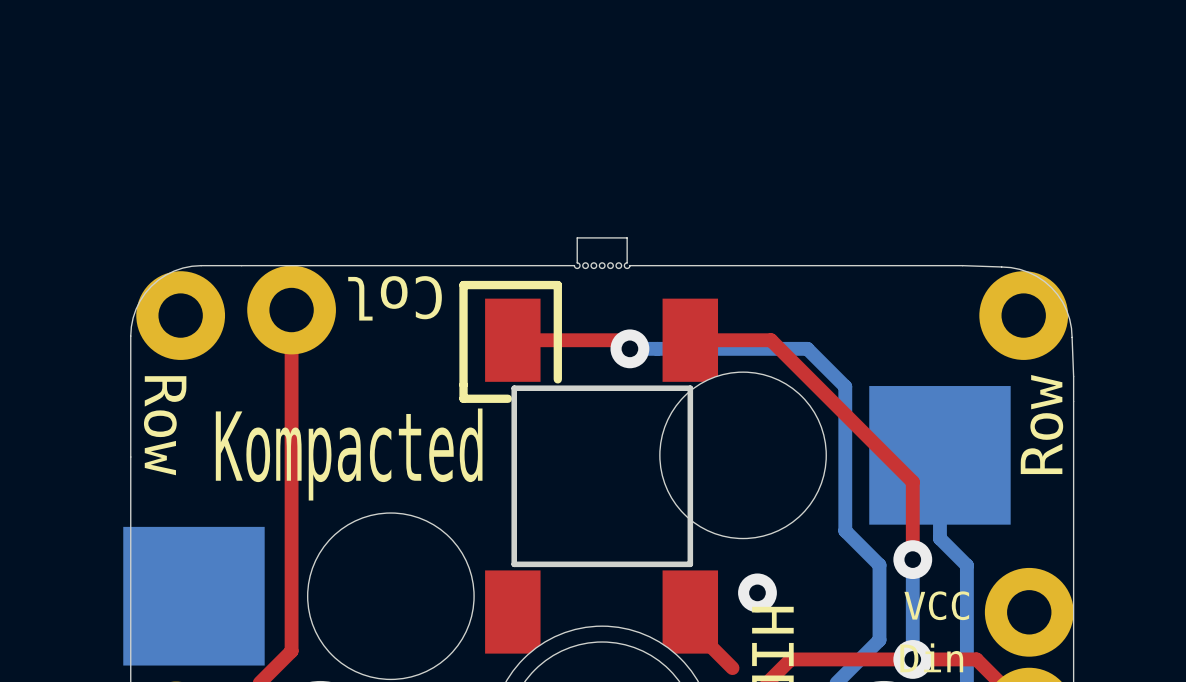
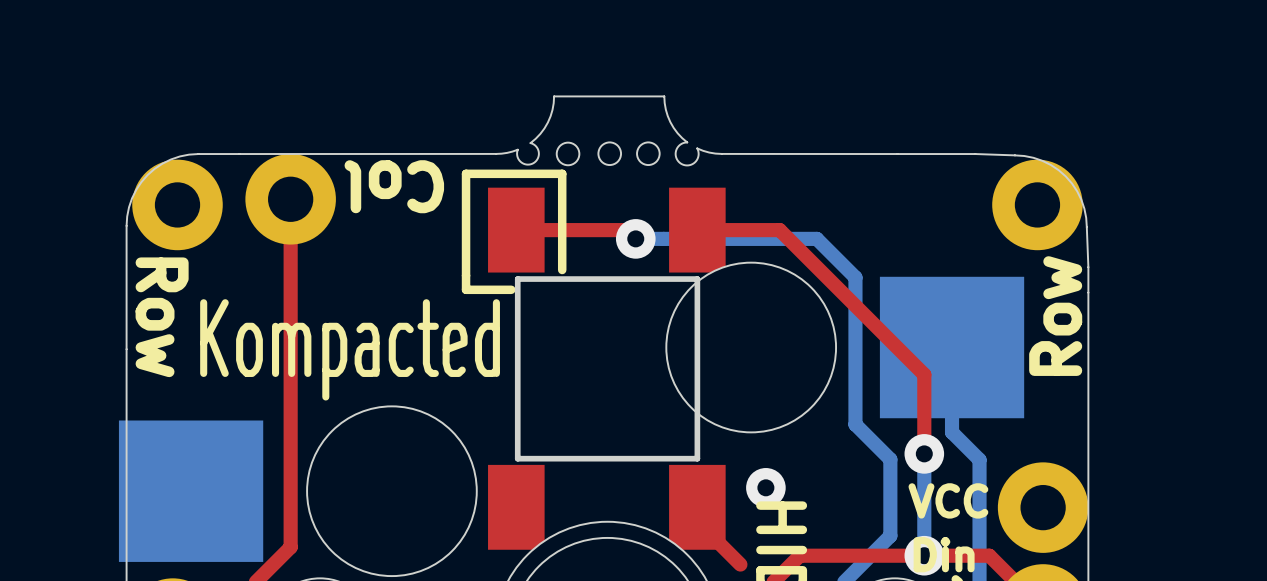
round board edge: none -> [636, 142, 660, 166]
round board edge: none -> [556, 142, 580, 166]
round board edge: [582, 262, 589, 269] -> none
round board edge: [590, 262, 597, 269] -> none
round board edge size: [599, 262, 606, 269] -> [598, 142, 622, 166]
round board edge: [607, 262, 614, 269] -> none
round board edge: [615, 262, 622, 269] -> none
board edge: (962, 265) (629, 265) (626, 268) (624, 265) (627, 262) (627, 237) (577, 237) (577, 262) (580, 265) (577, 268) (574, 265) (241, 265) -> (975, 154) (721, 153) (697, 148) (698, 154) (696, 159) (691, 164) (685, 165) (677, 160) (675, 152) (679, 145) (687, 142) (677, 133) (670, 122) (665, 109) (664, 96) (554, 96) (552, 109) (547, 122) (540, 133) (530, 143) (537, 149) (538, 157) (535, 161) (529, 164) (519, 160) (517, 149) (496, 153) (239, 154)

